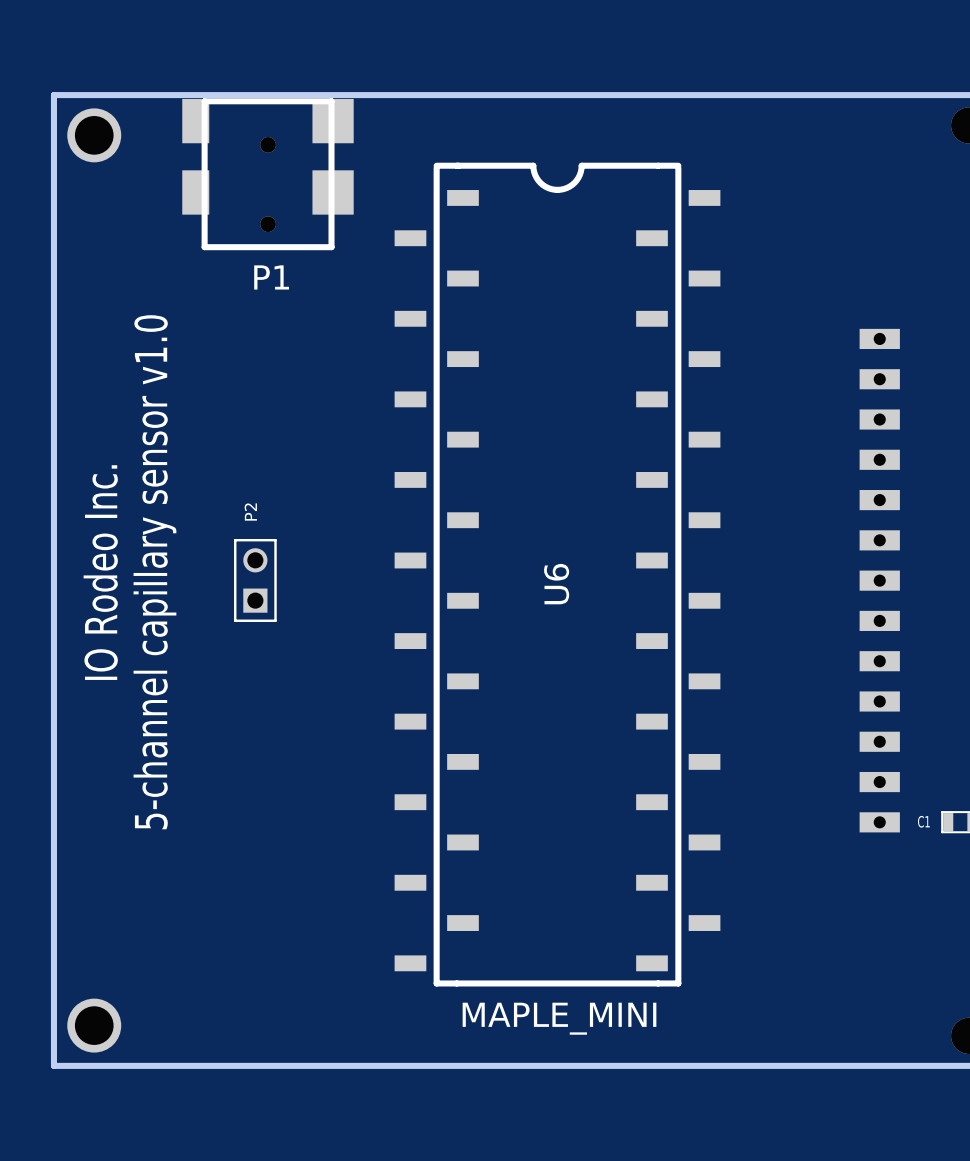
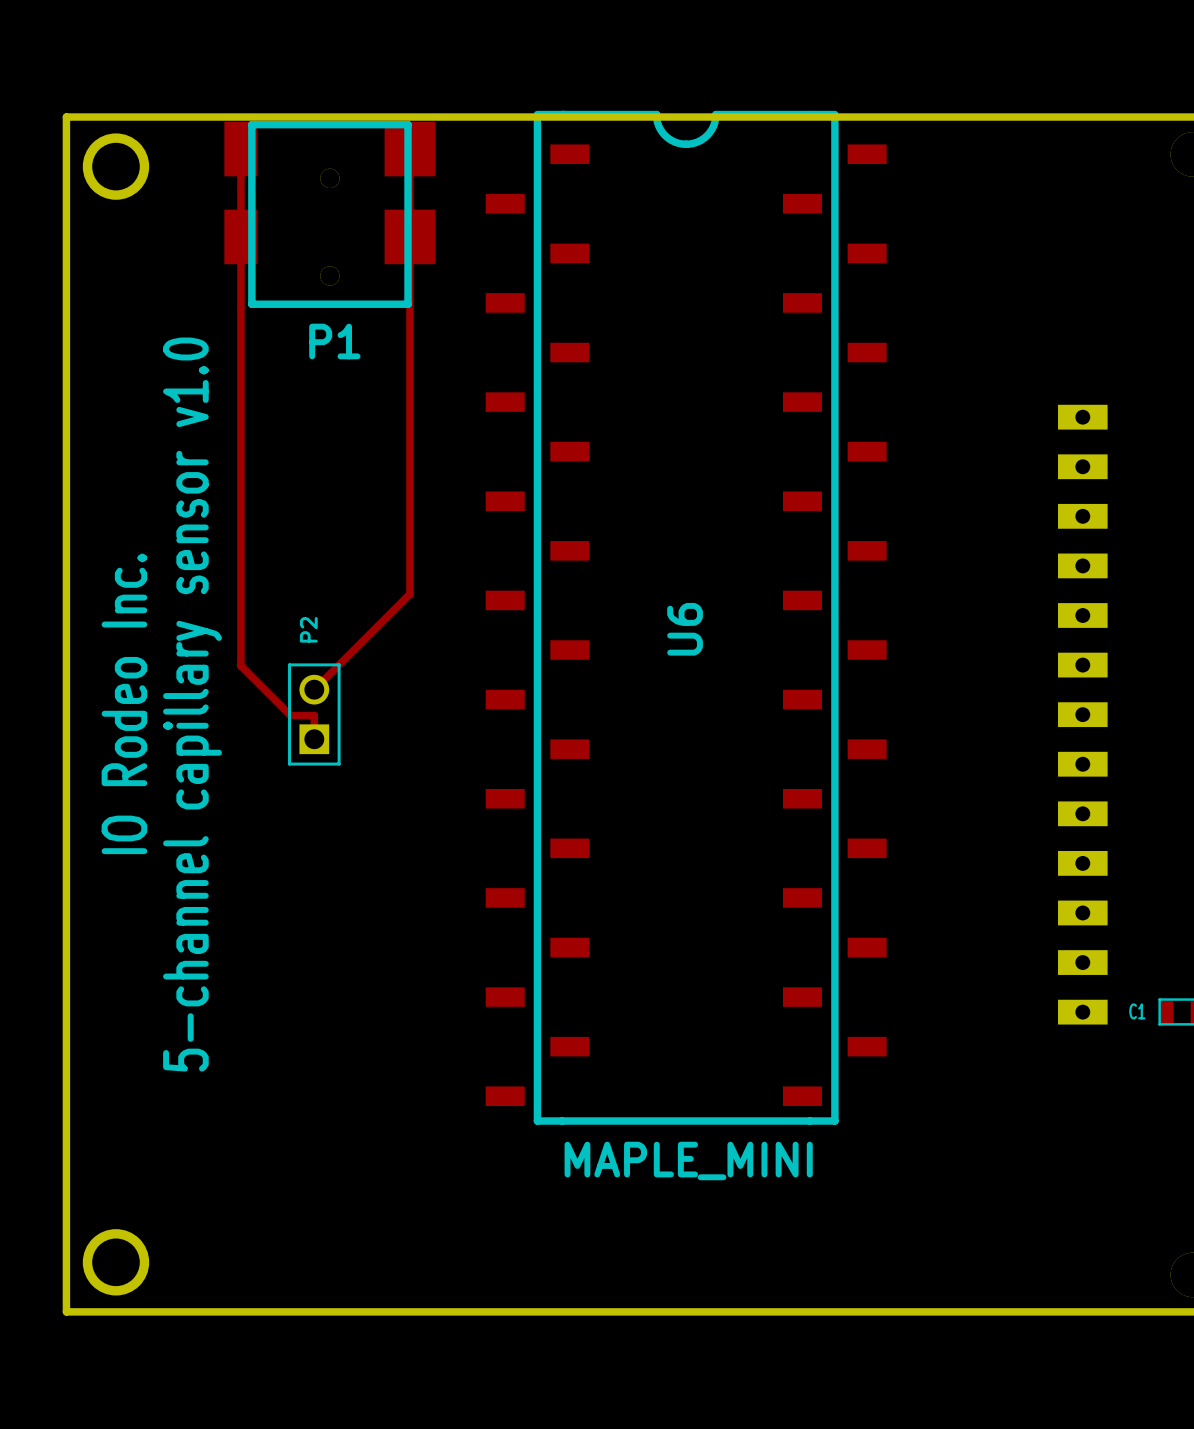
track: none -> (240, 149) (240, 665) (290, 715) (314, 715) (314, 739)
track: none -> (409, 149) (409, 594) (314, 689)
U6 position: (557, 574) -> (686, 617)

